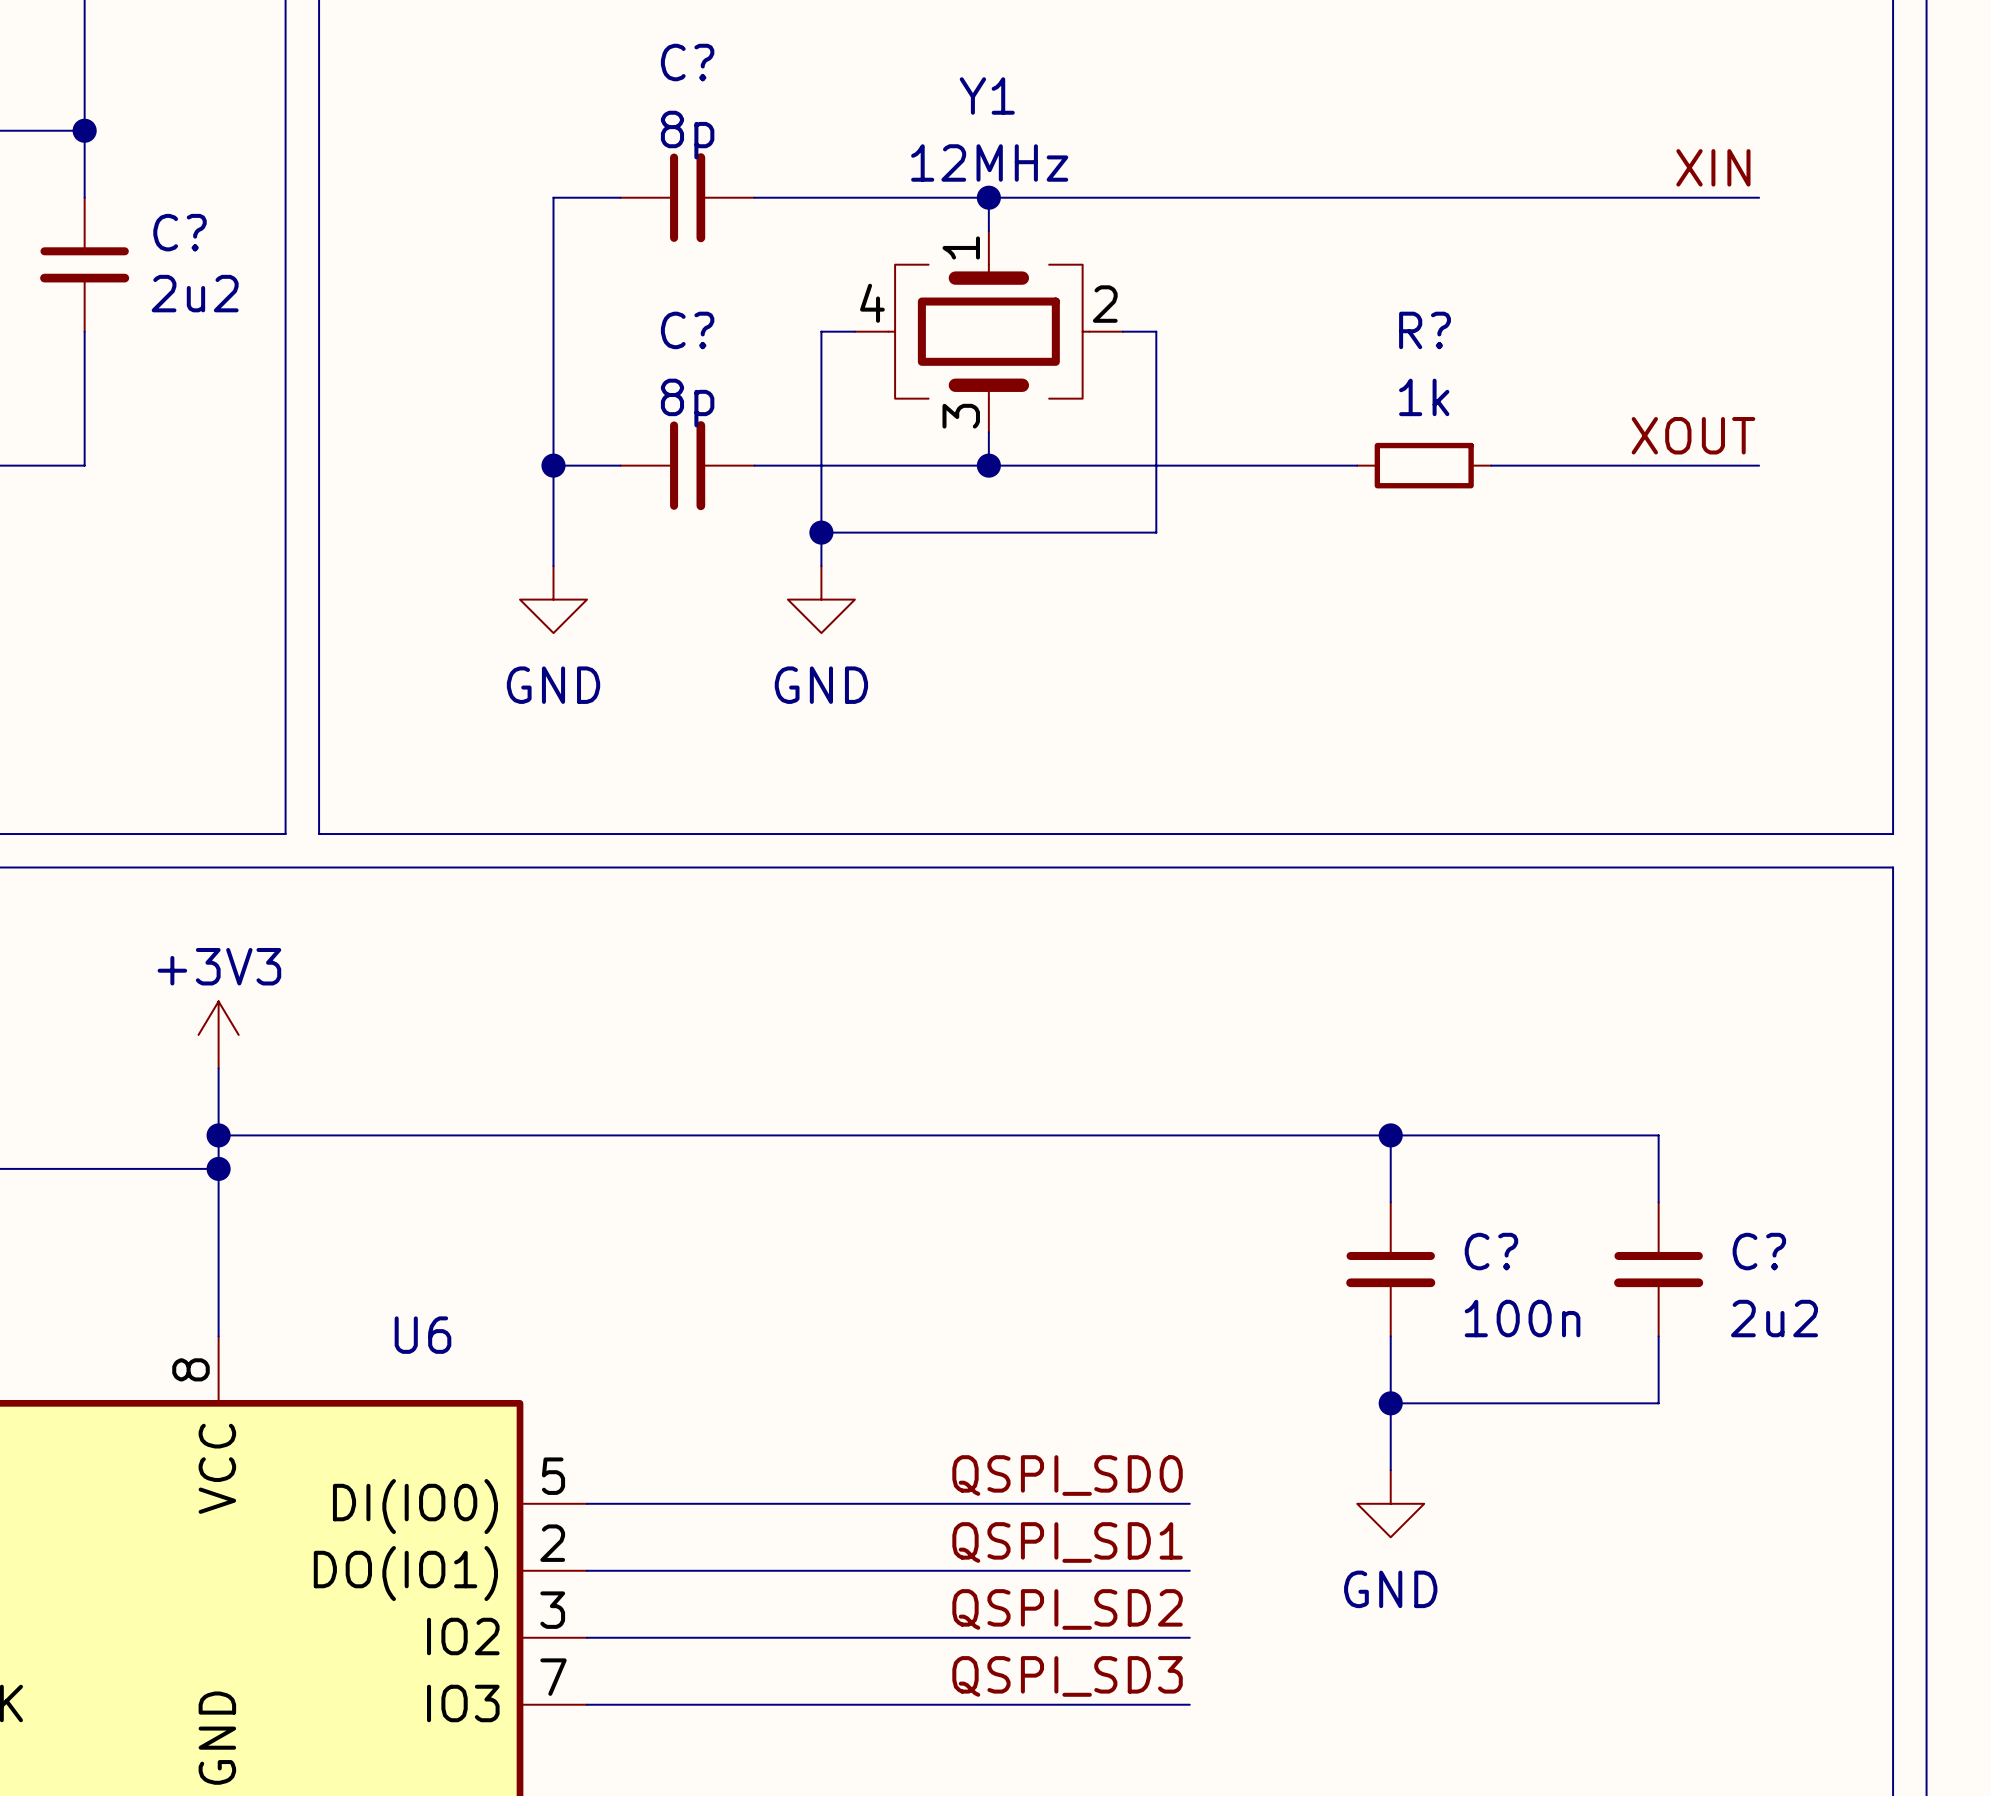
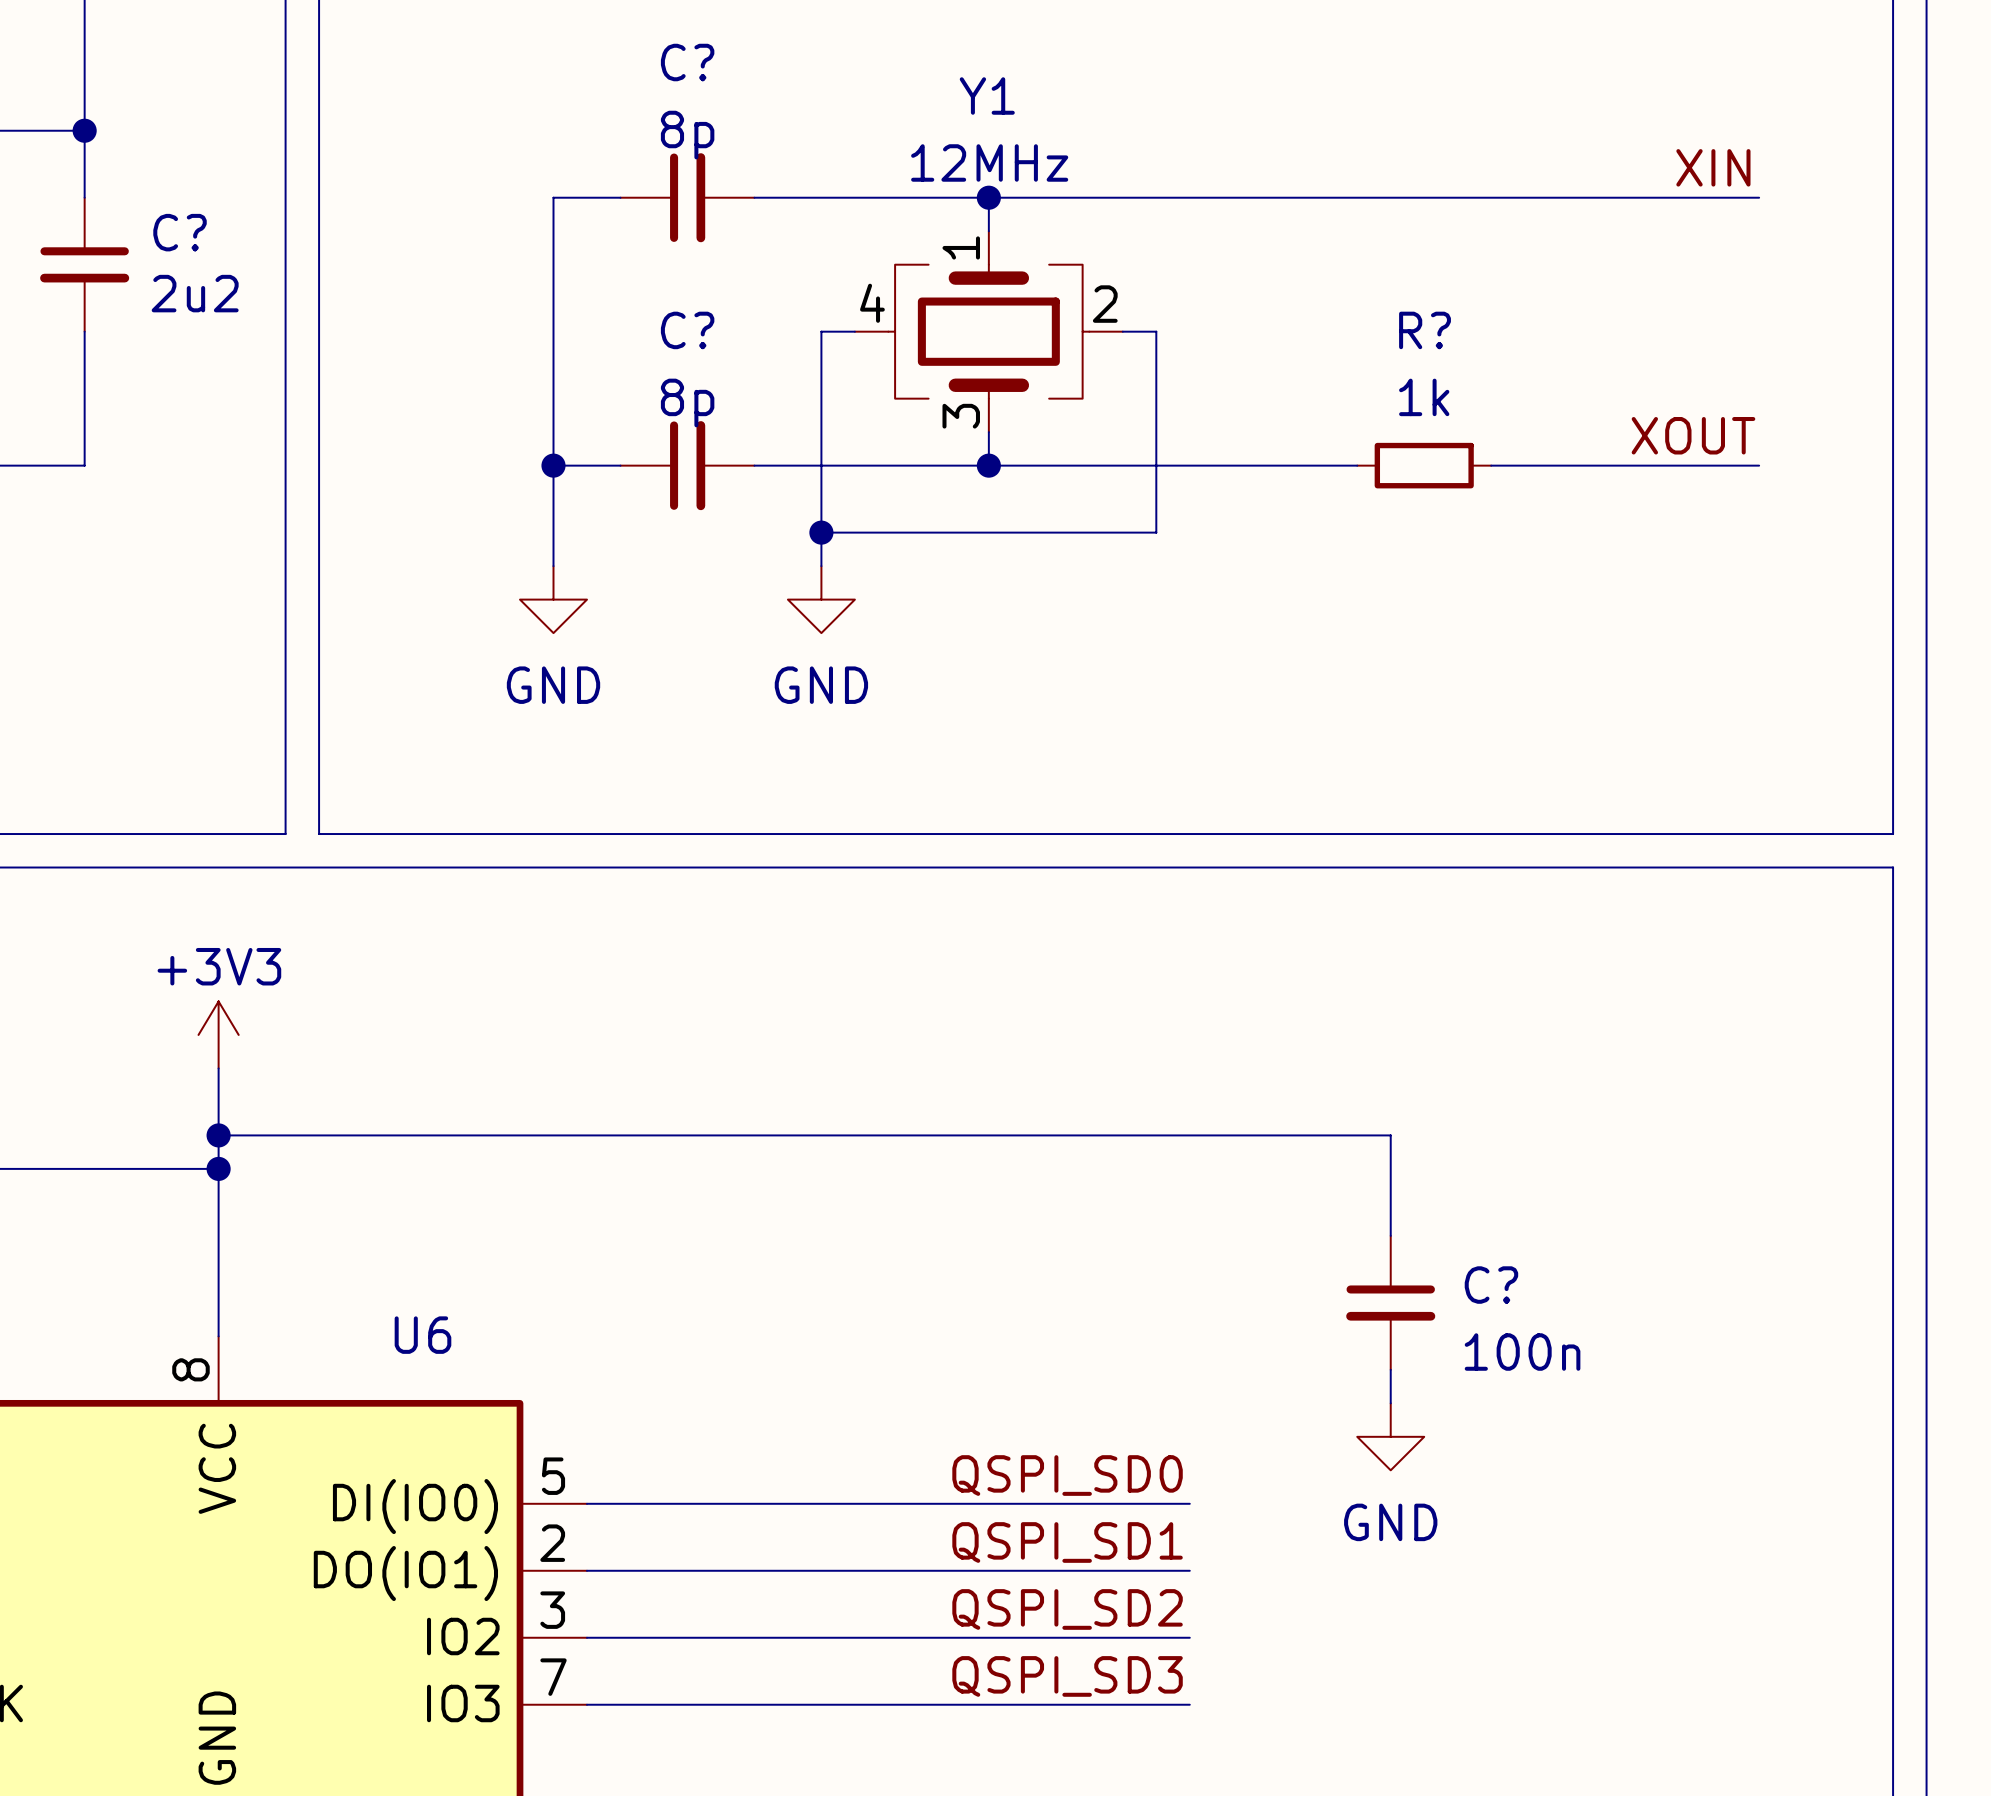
wire: (1390, 1135) (1658, 1135) (1658, 1202) -> none
junction: (1390, 1135) -> none
C? position: (1390, 1269) -> (1390, 1302)
C?: 2u2 (1658, 1269) -> none
wire: (1658, 1336) (1658, 1403) (1390, 1403) (1390, 1470) -> none
junction: (1390, 1403) -> none
power symbol position: GND (1390, 1503) -> GND (1390, 1436)

